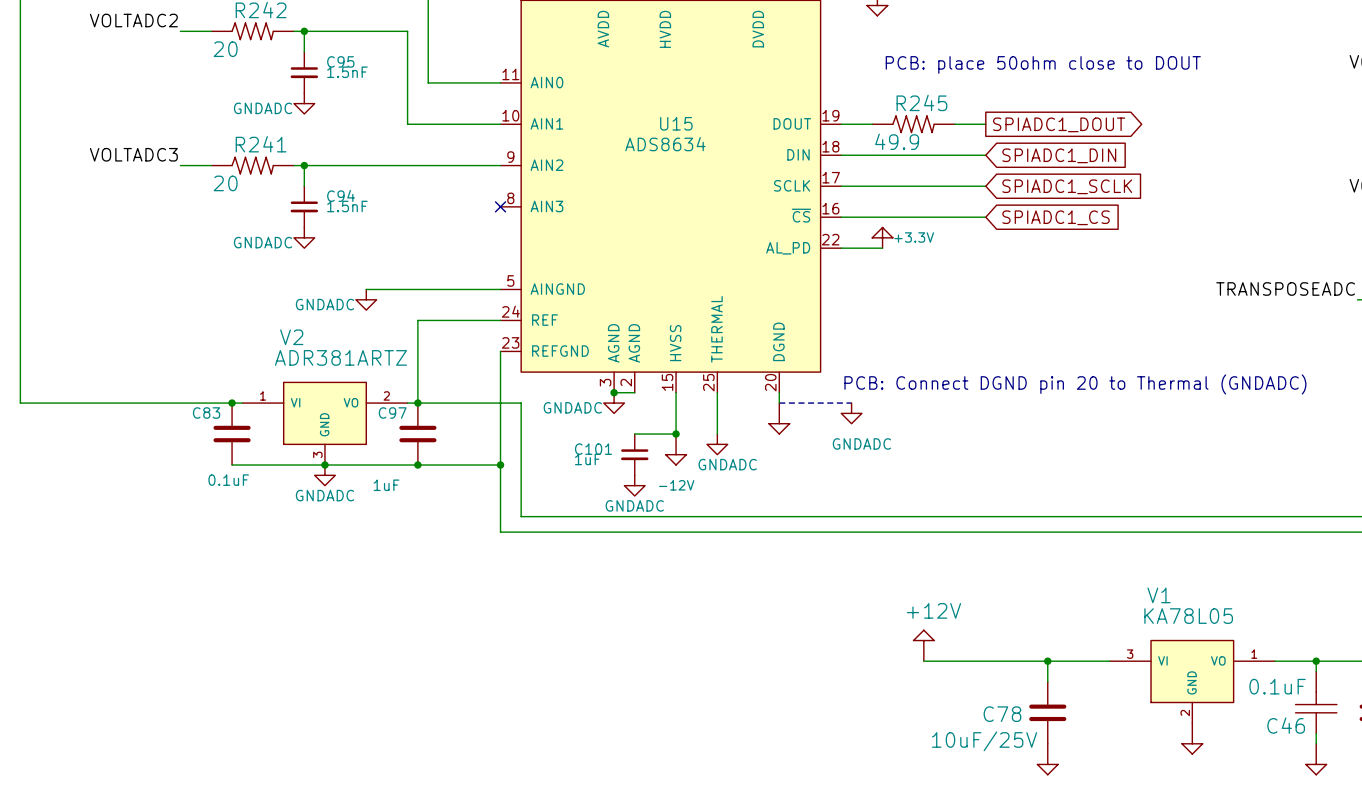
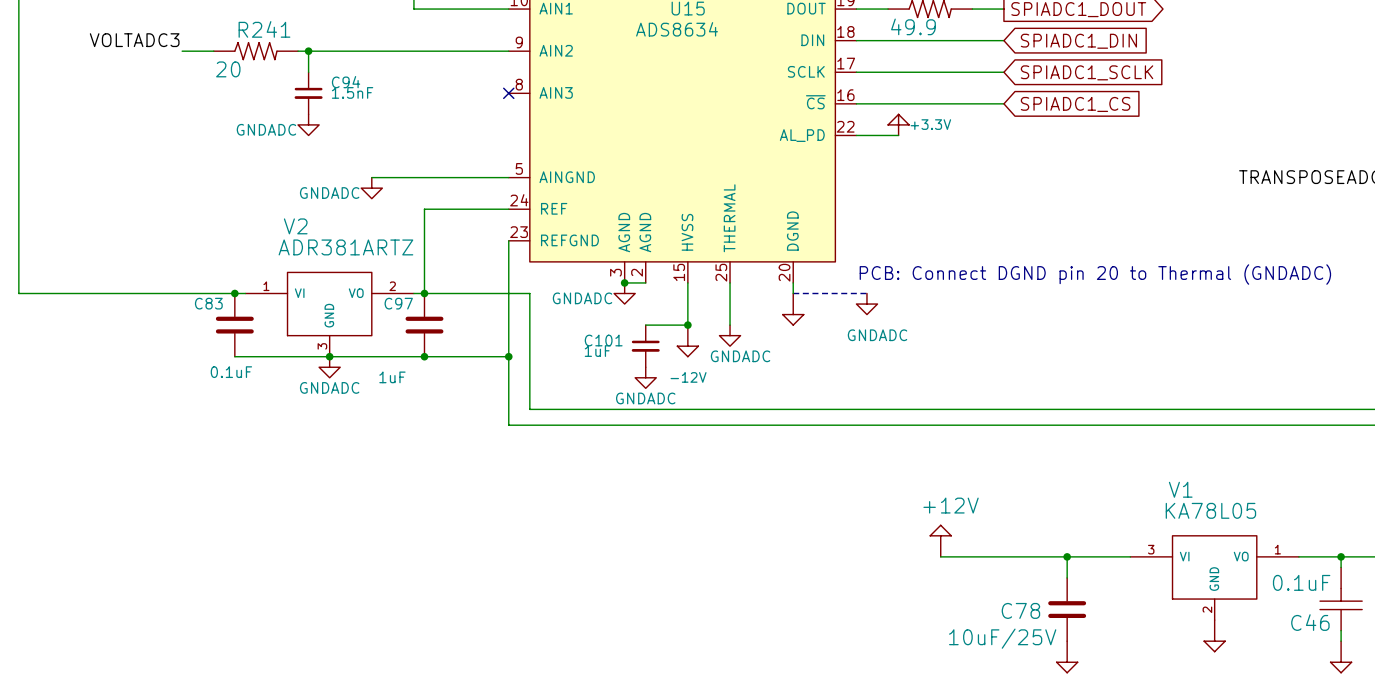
V2 symbol: [242, 382, 408, 466] -> [245, 272, 414, 357]
V1 symbol: [1109, 640, 1275, 724] -> [1130, 535, 1299, 621]

